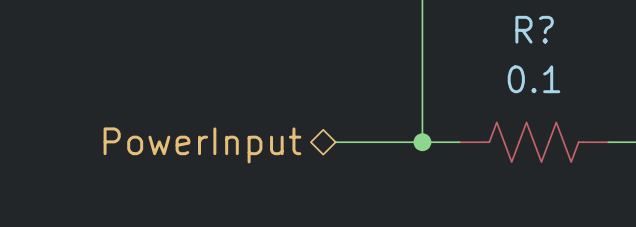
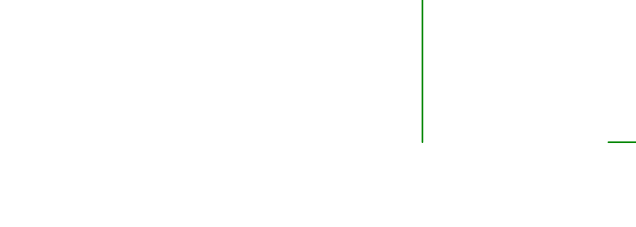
wire: (335, 142) (459, 142) -> none
junction: (422, 142) -> none
R?: 0.1 (533, 142) -> none
hierarchical label: PowerInput (202, 145) -> none

